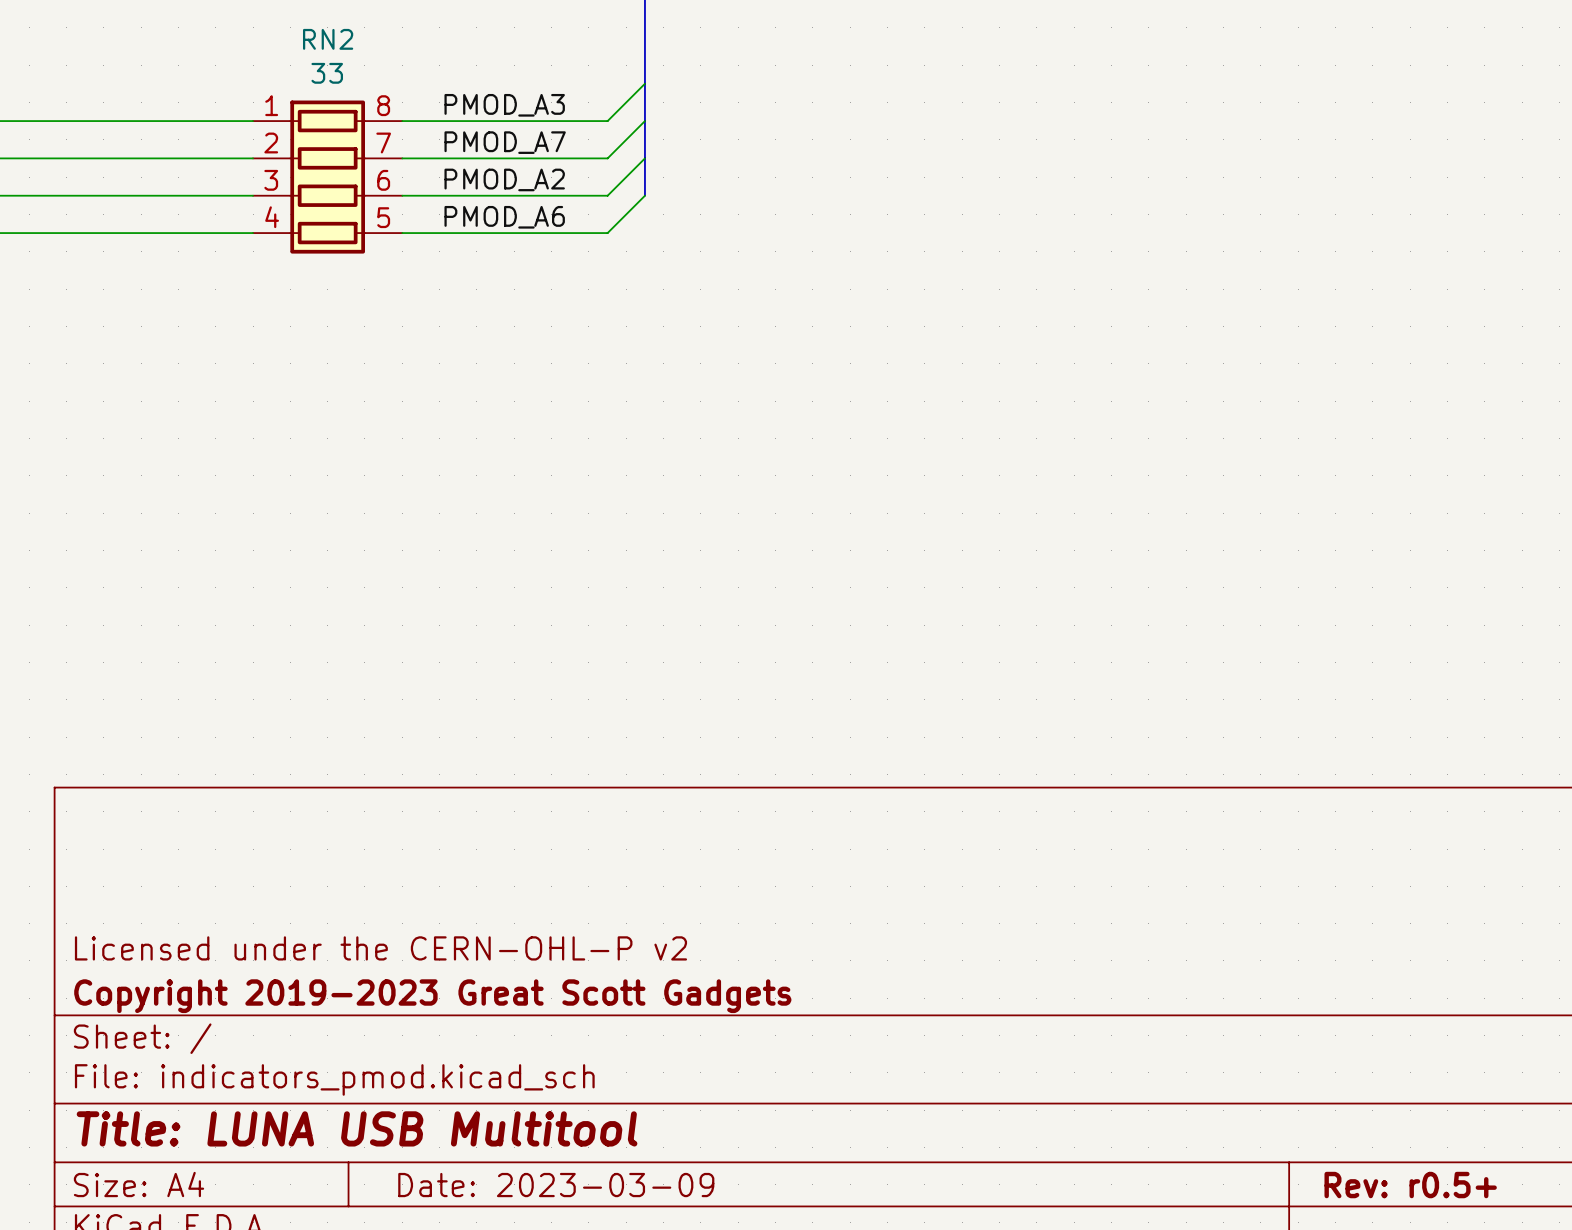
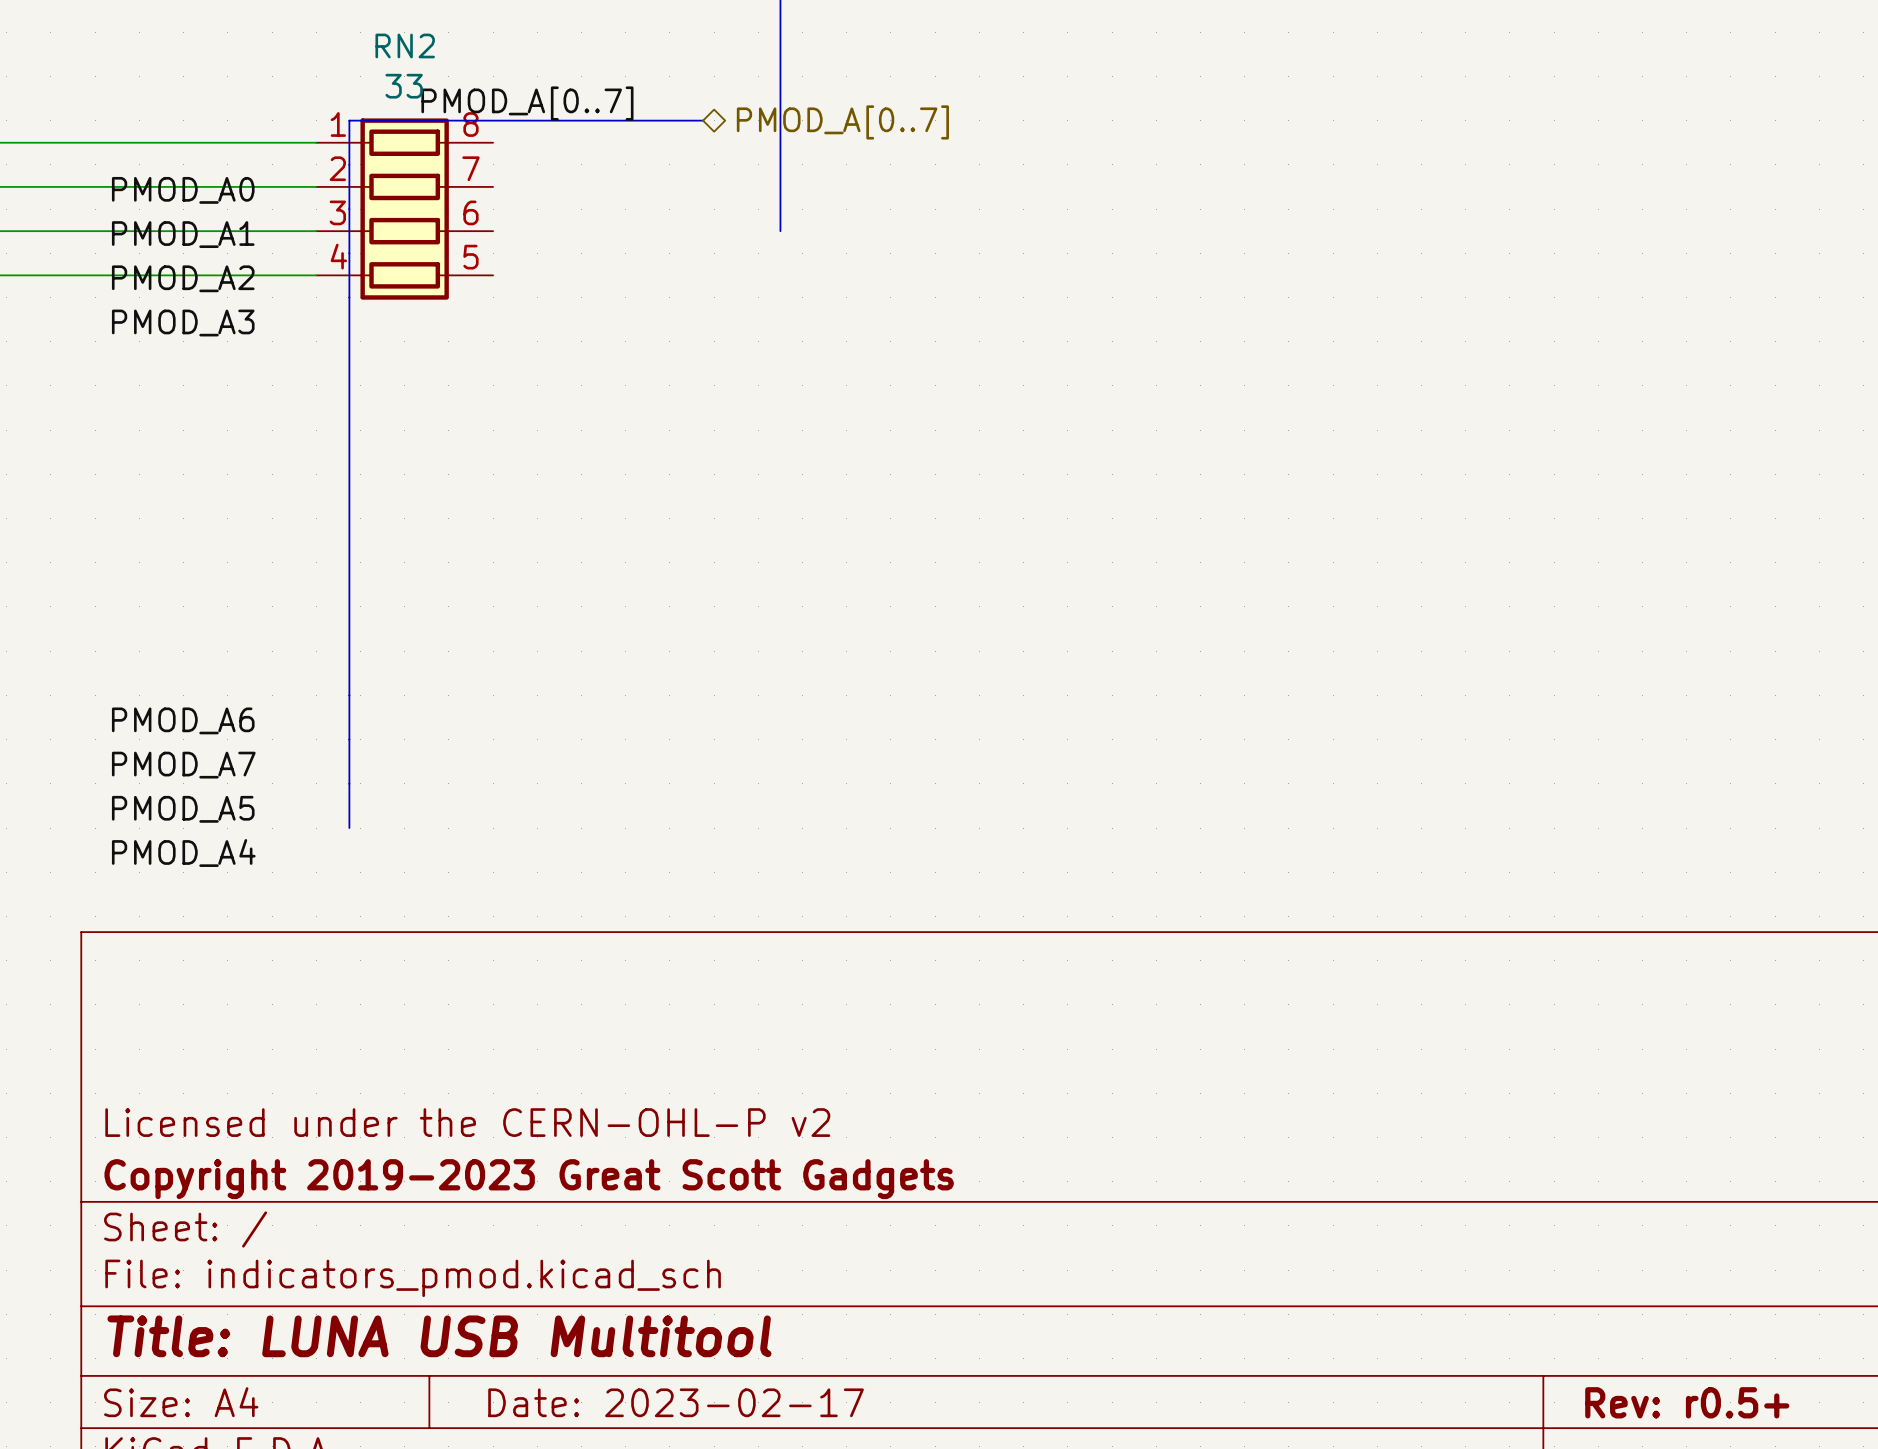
wire: (644, 83) (607, 121) (402, 121) -> none
bus: none -> (703, 120) (349, 120) (349, 828)
hierarchical label: none -> PMOD_A[0..7] (842, 122)
label: PMOD_A3 (504, 105) -> PMOD_A[0..7] (527, 103)
wire: (644, 121) (607, 158) (402, 158) -> none
label: PMOD_A7 (505, 142) -> none
wire: (644, 158) (607, 195) (402, 195) -> none
label: none -> PMOD_A0 (183, 190)
label: PMOD_A2 (504, 179) -> none
wire: (644, 195) (607, 233) (402, 233) -> none
label: none -> PMOD_A1 (183, 234)
label: PMOD_A6 (504, 217) -> none
label: none -> PMOD_A2 (183, 278)
label: none -> PMOD_A3 (183, 323)
label: none -> PMOD_A6 (183, 720)
label: none -> PMOD_A7 (183, 765)
label: none -> PMOD_A5 (183, 809)
label: none -> PMOD_A4 (183, 853)
title block: Date: 2023-03-09 (556, 1185) -> Date: 2023-02-17 (676, 1402)

